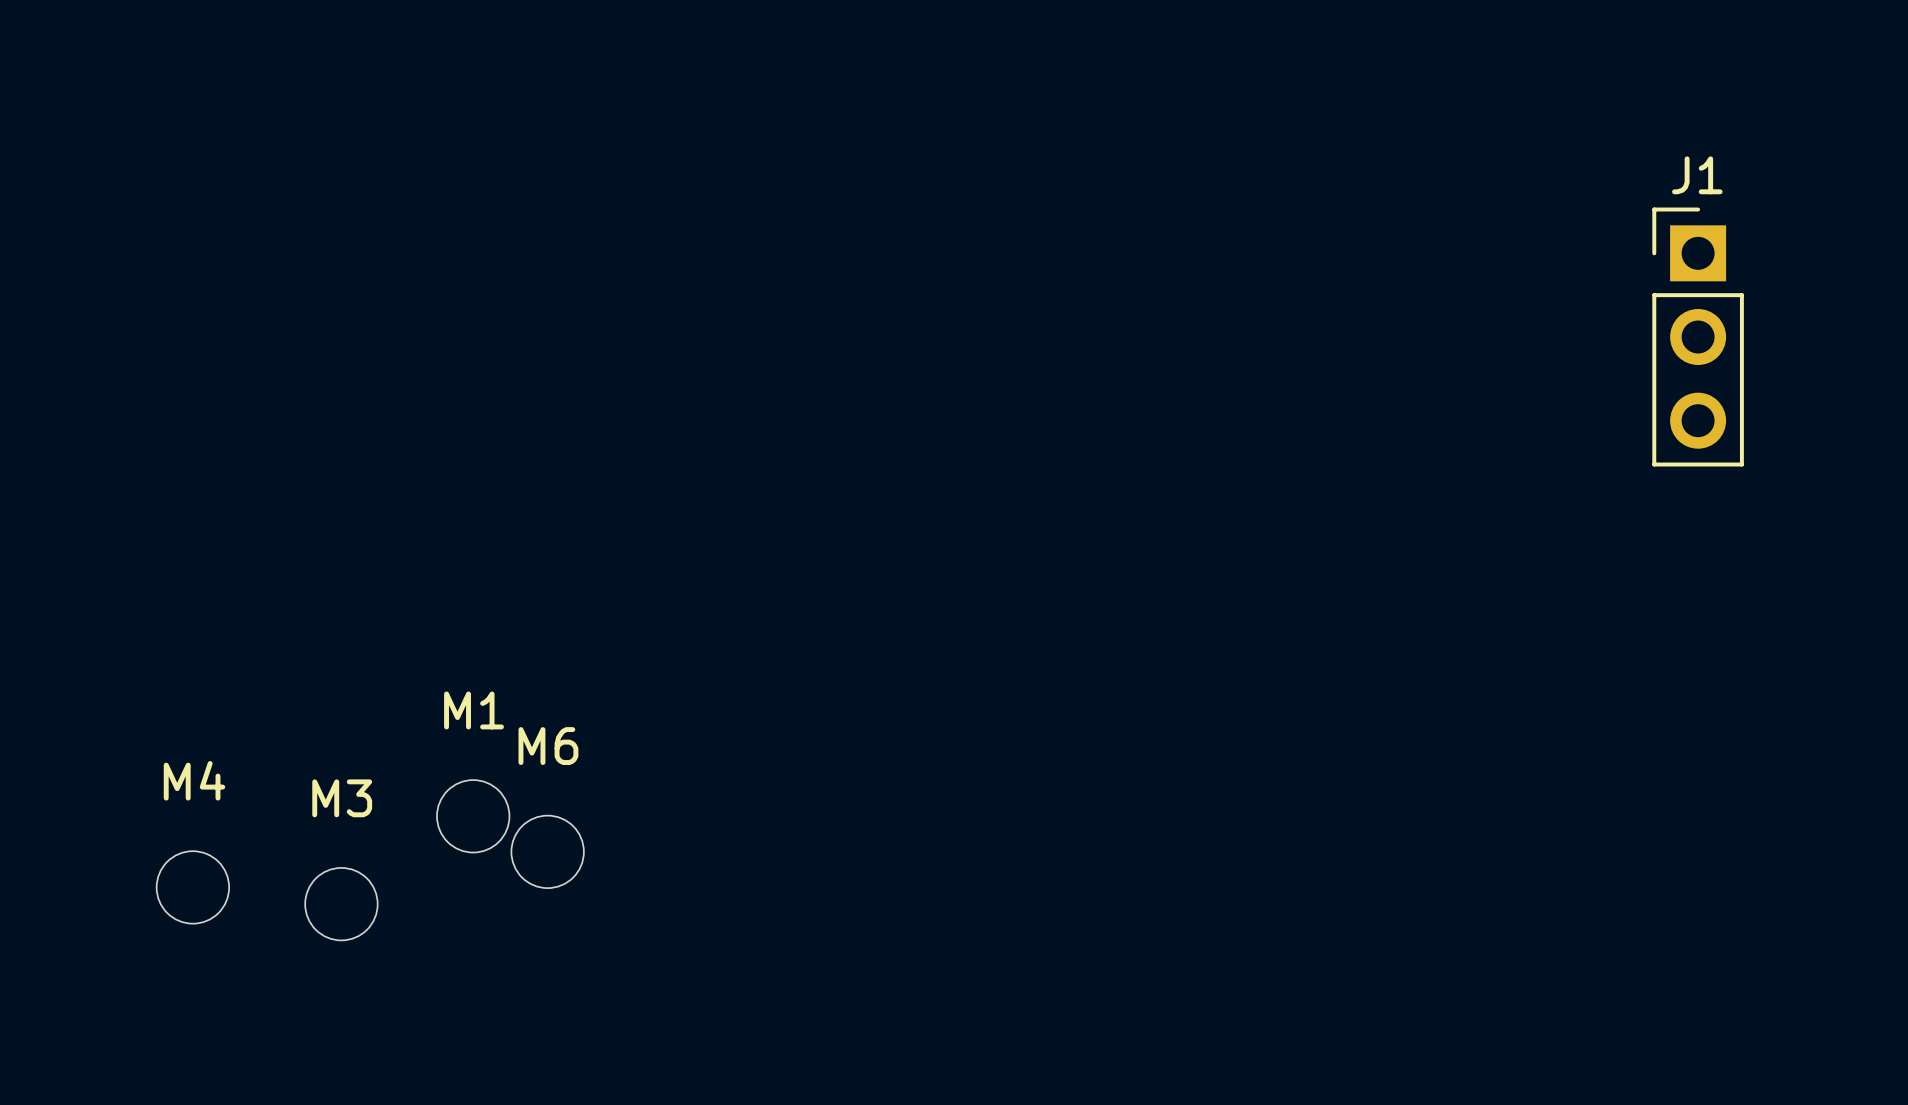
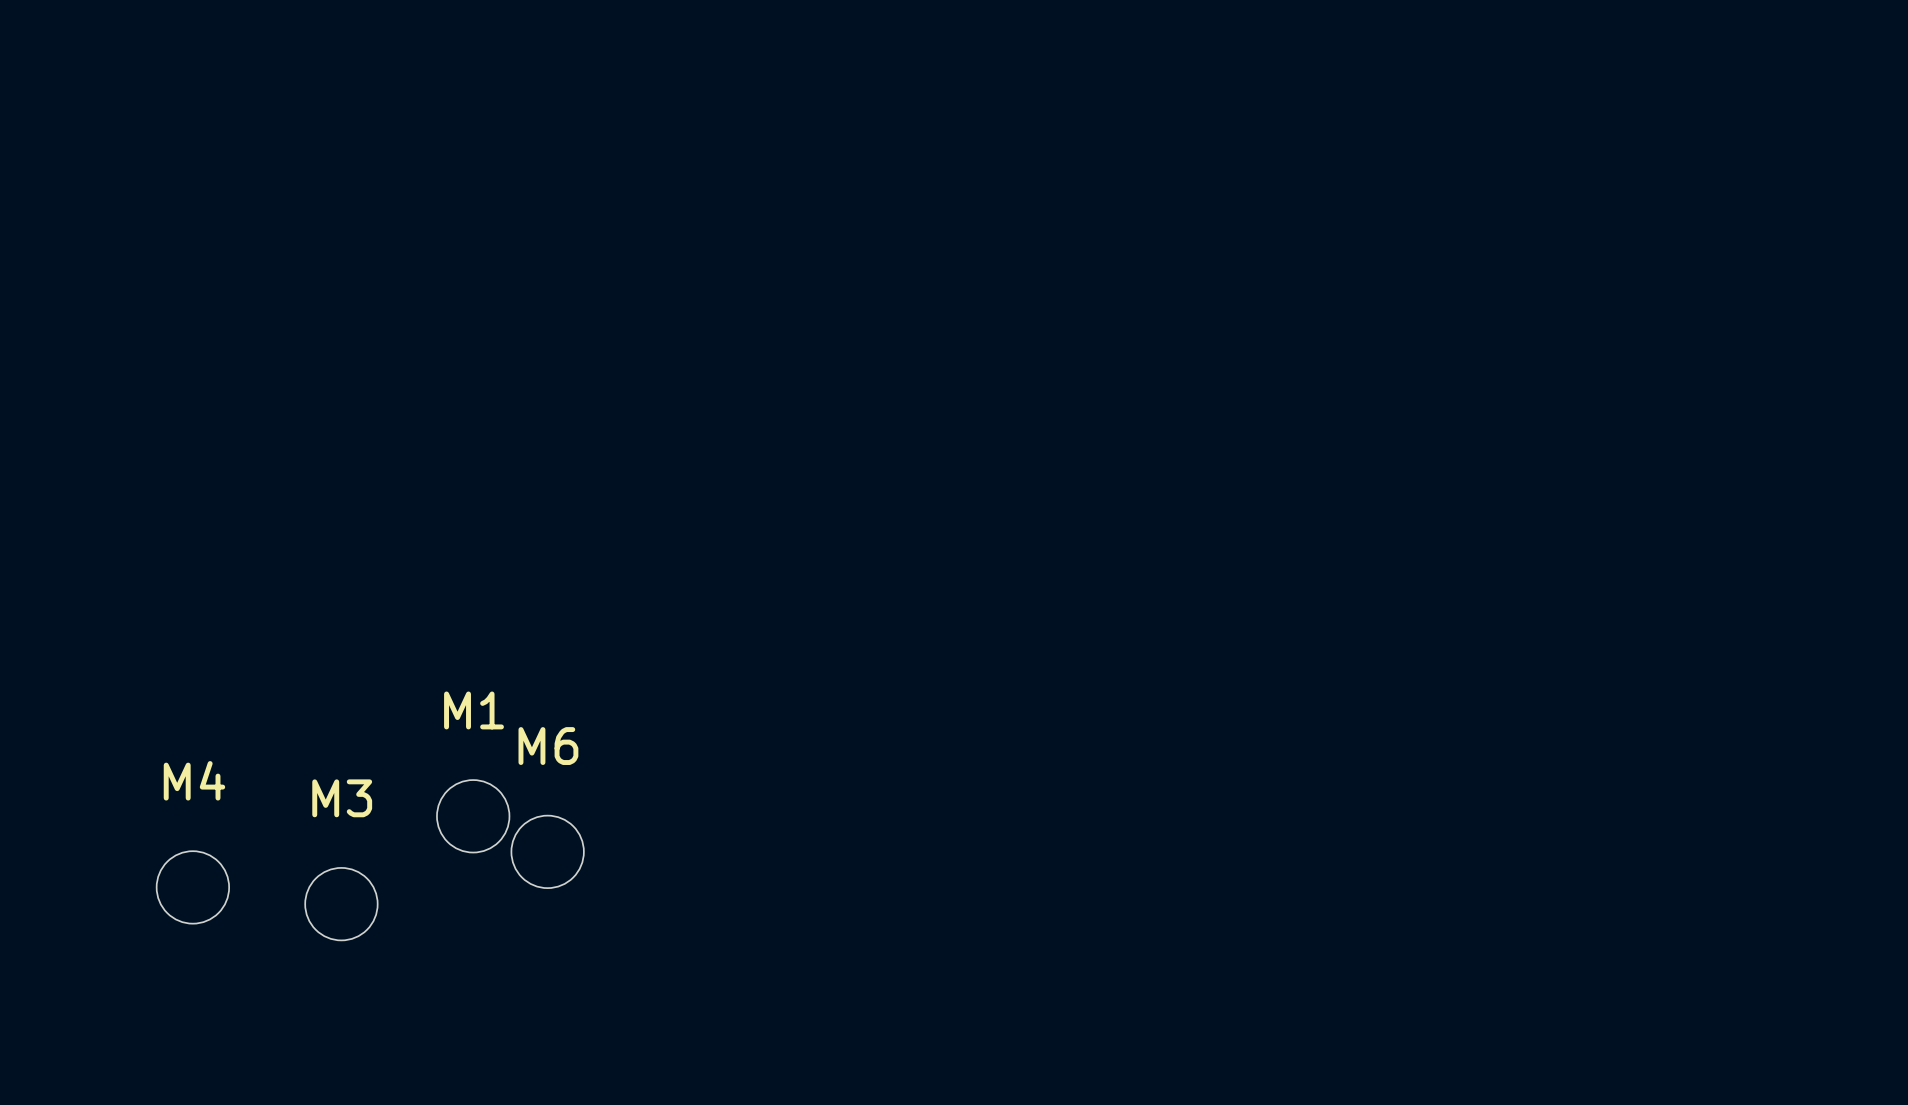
J1: (1698, 337) -> none

